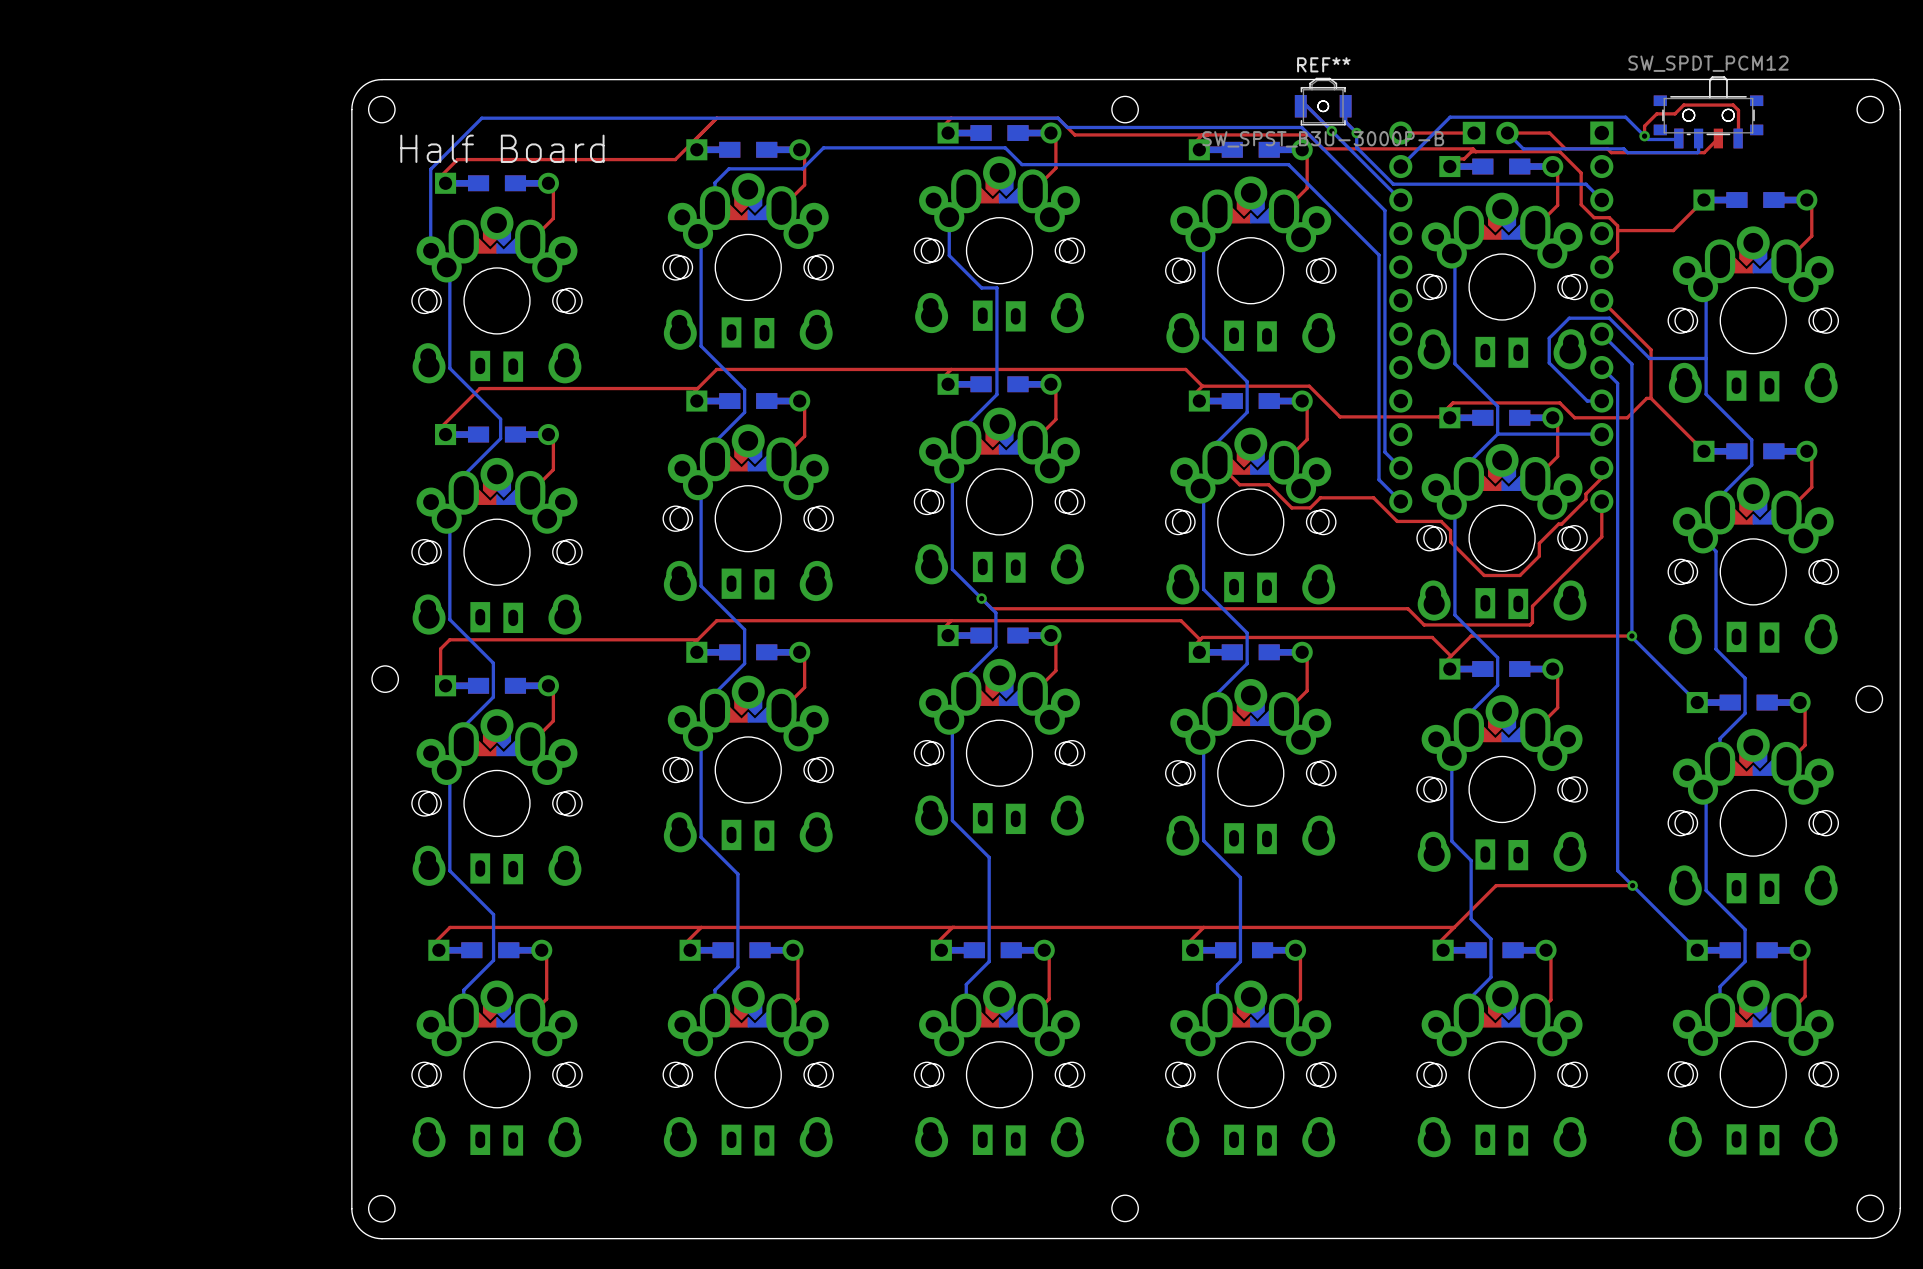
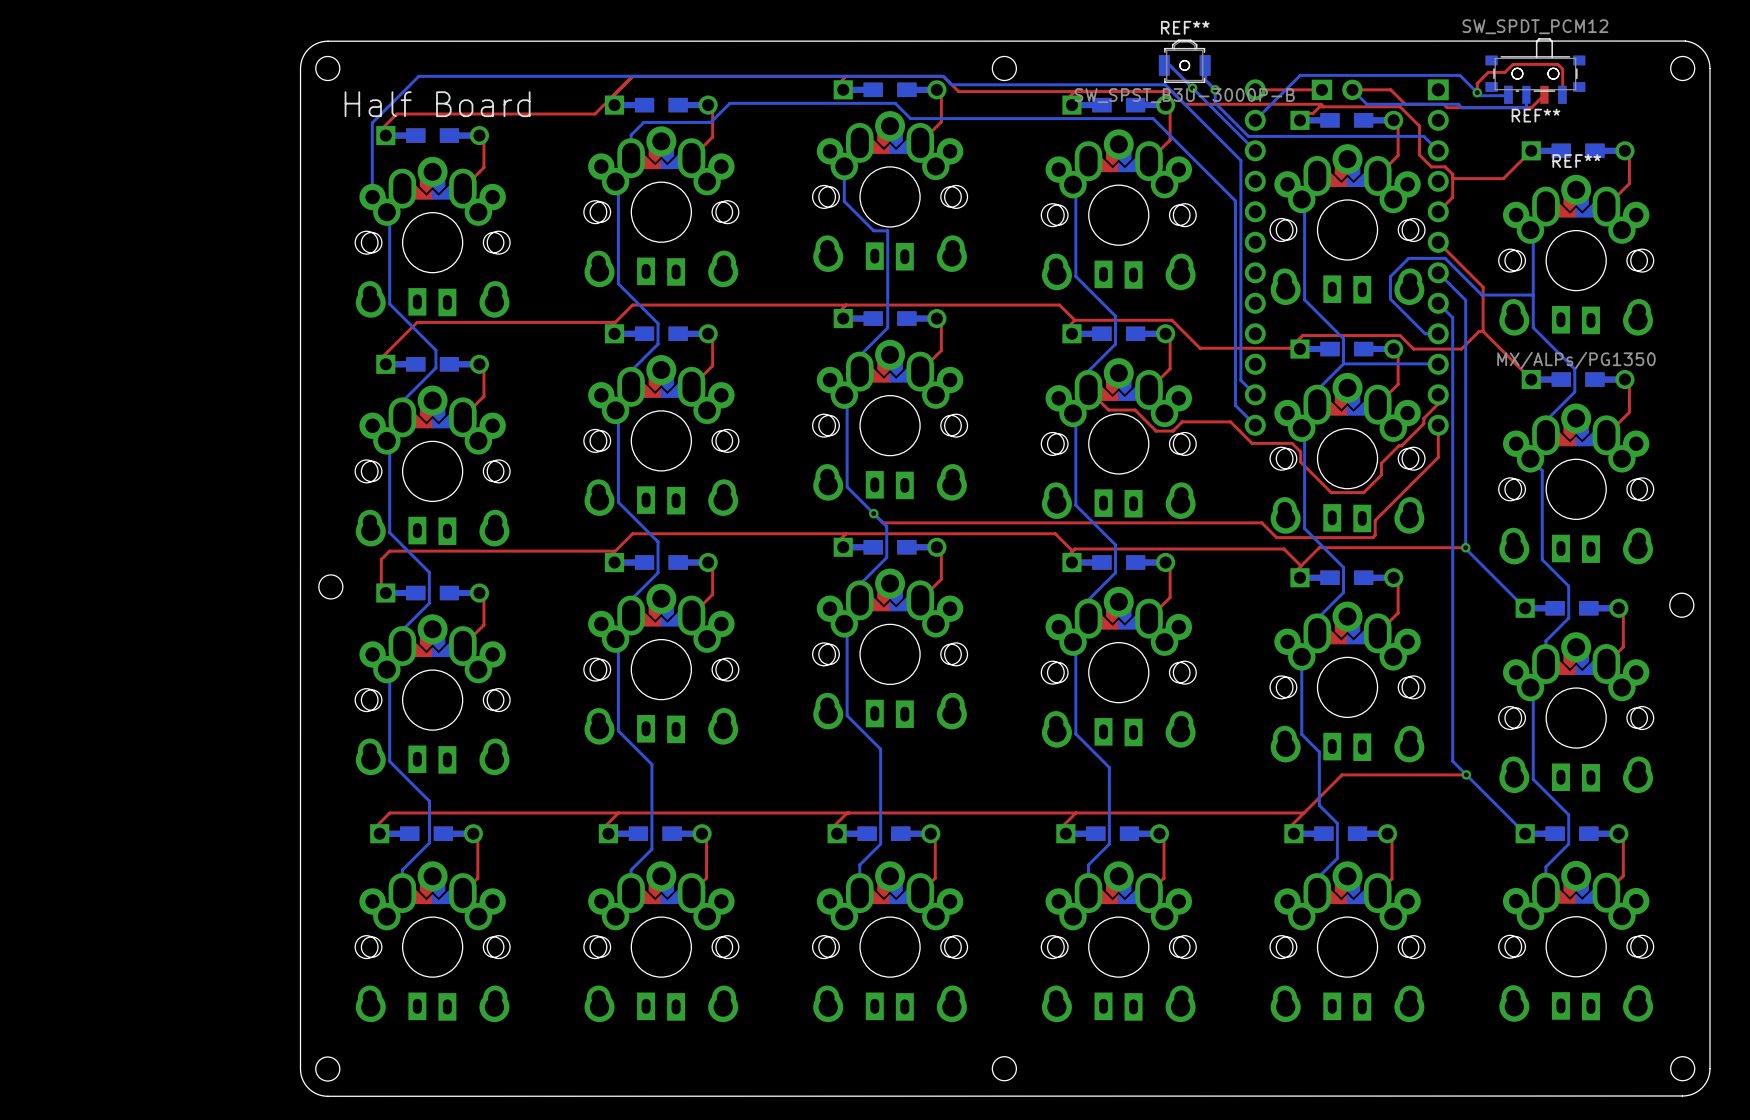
REF** name: none -> REF** (1535, 115)
REF** name: none -> REF** (1576, 161)
REF** value: none -> MX/ALPs/PG1350 (1576, 360)

